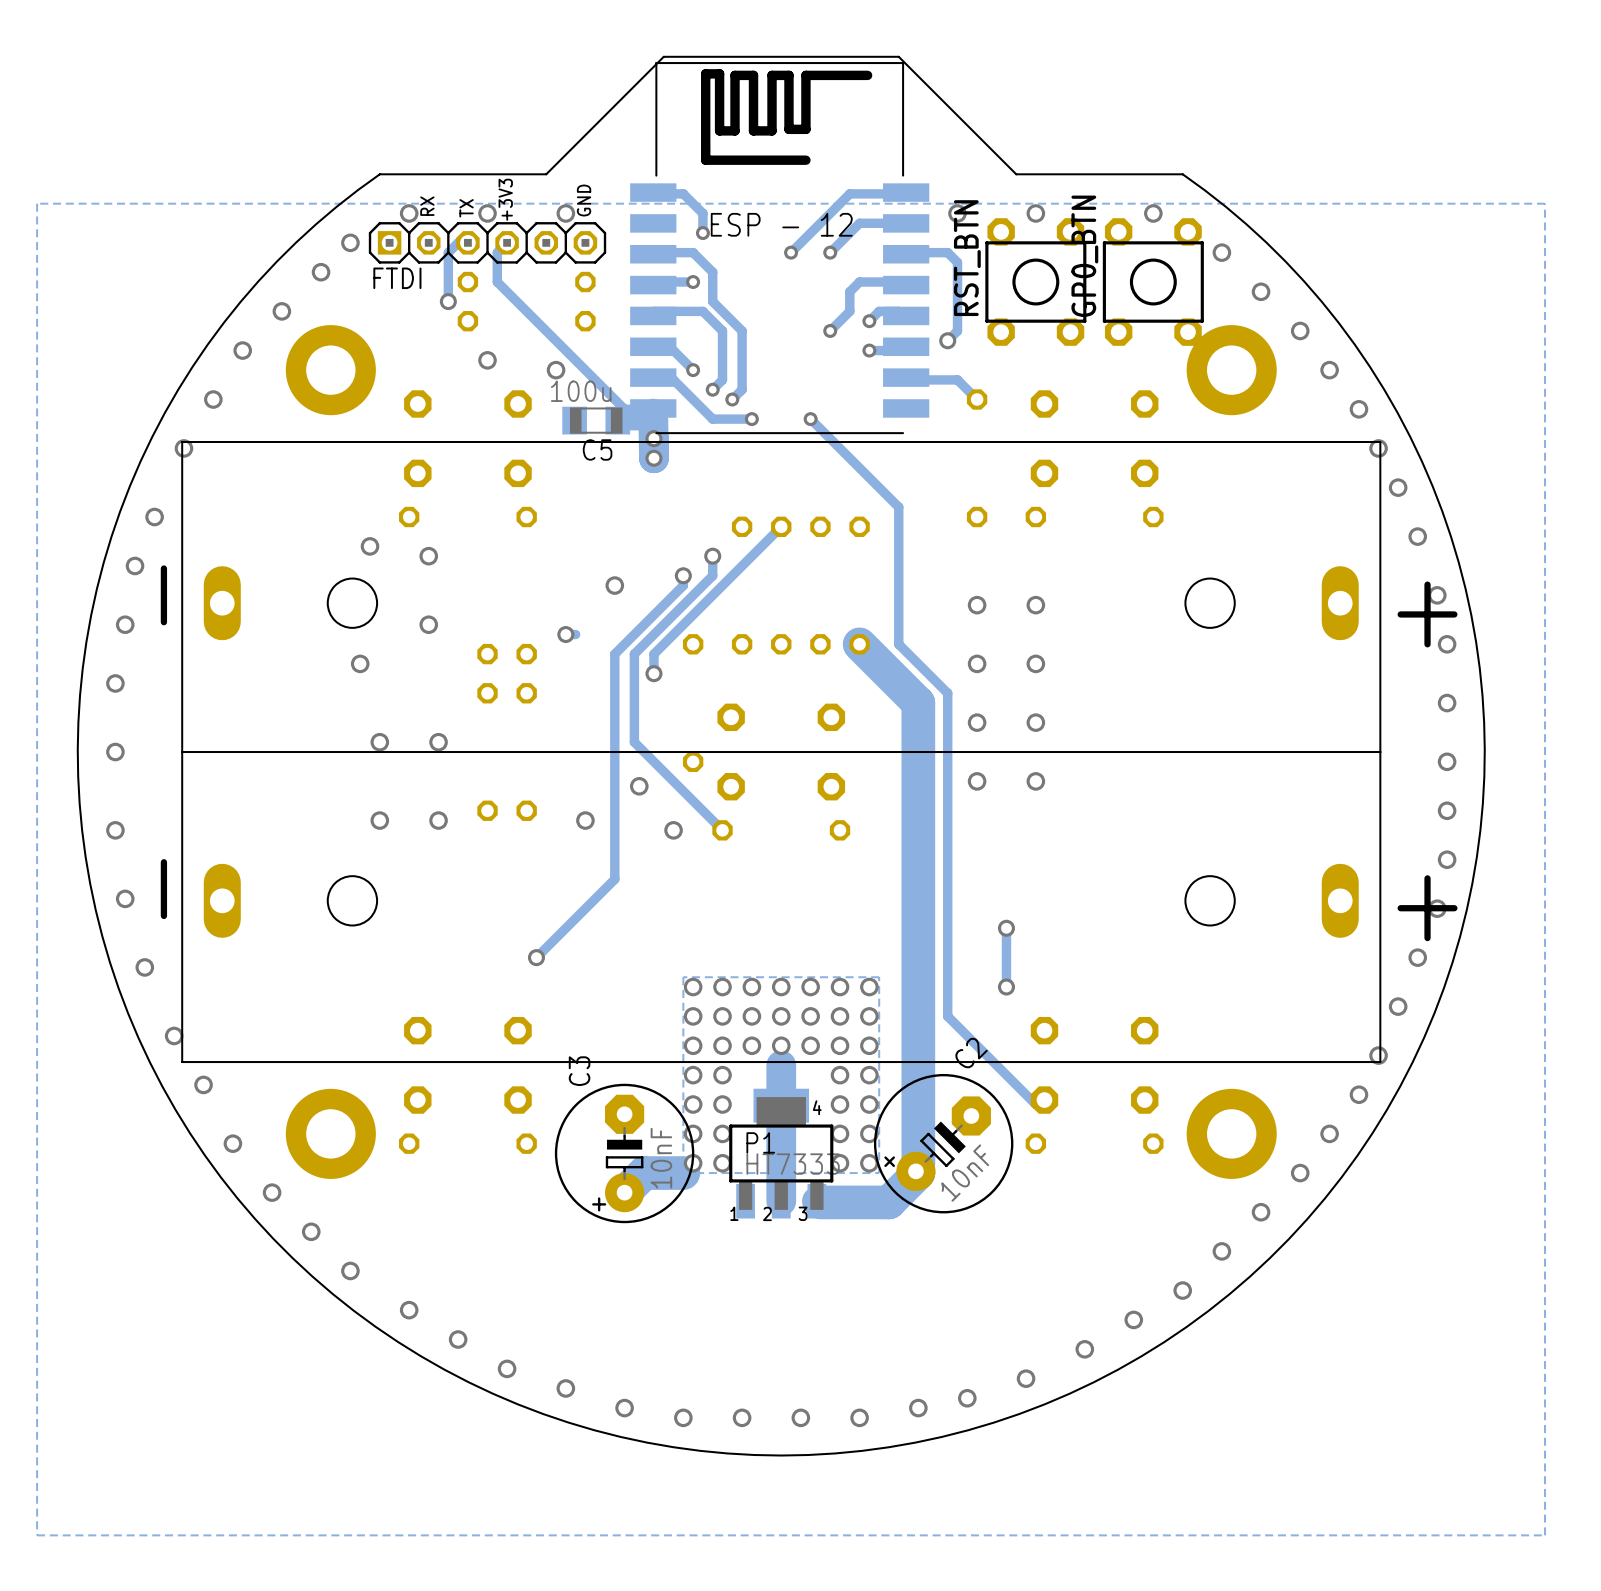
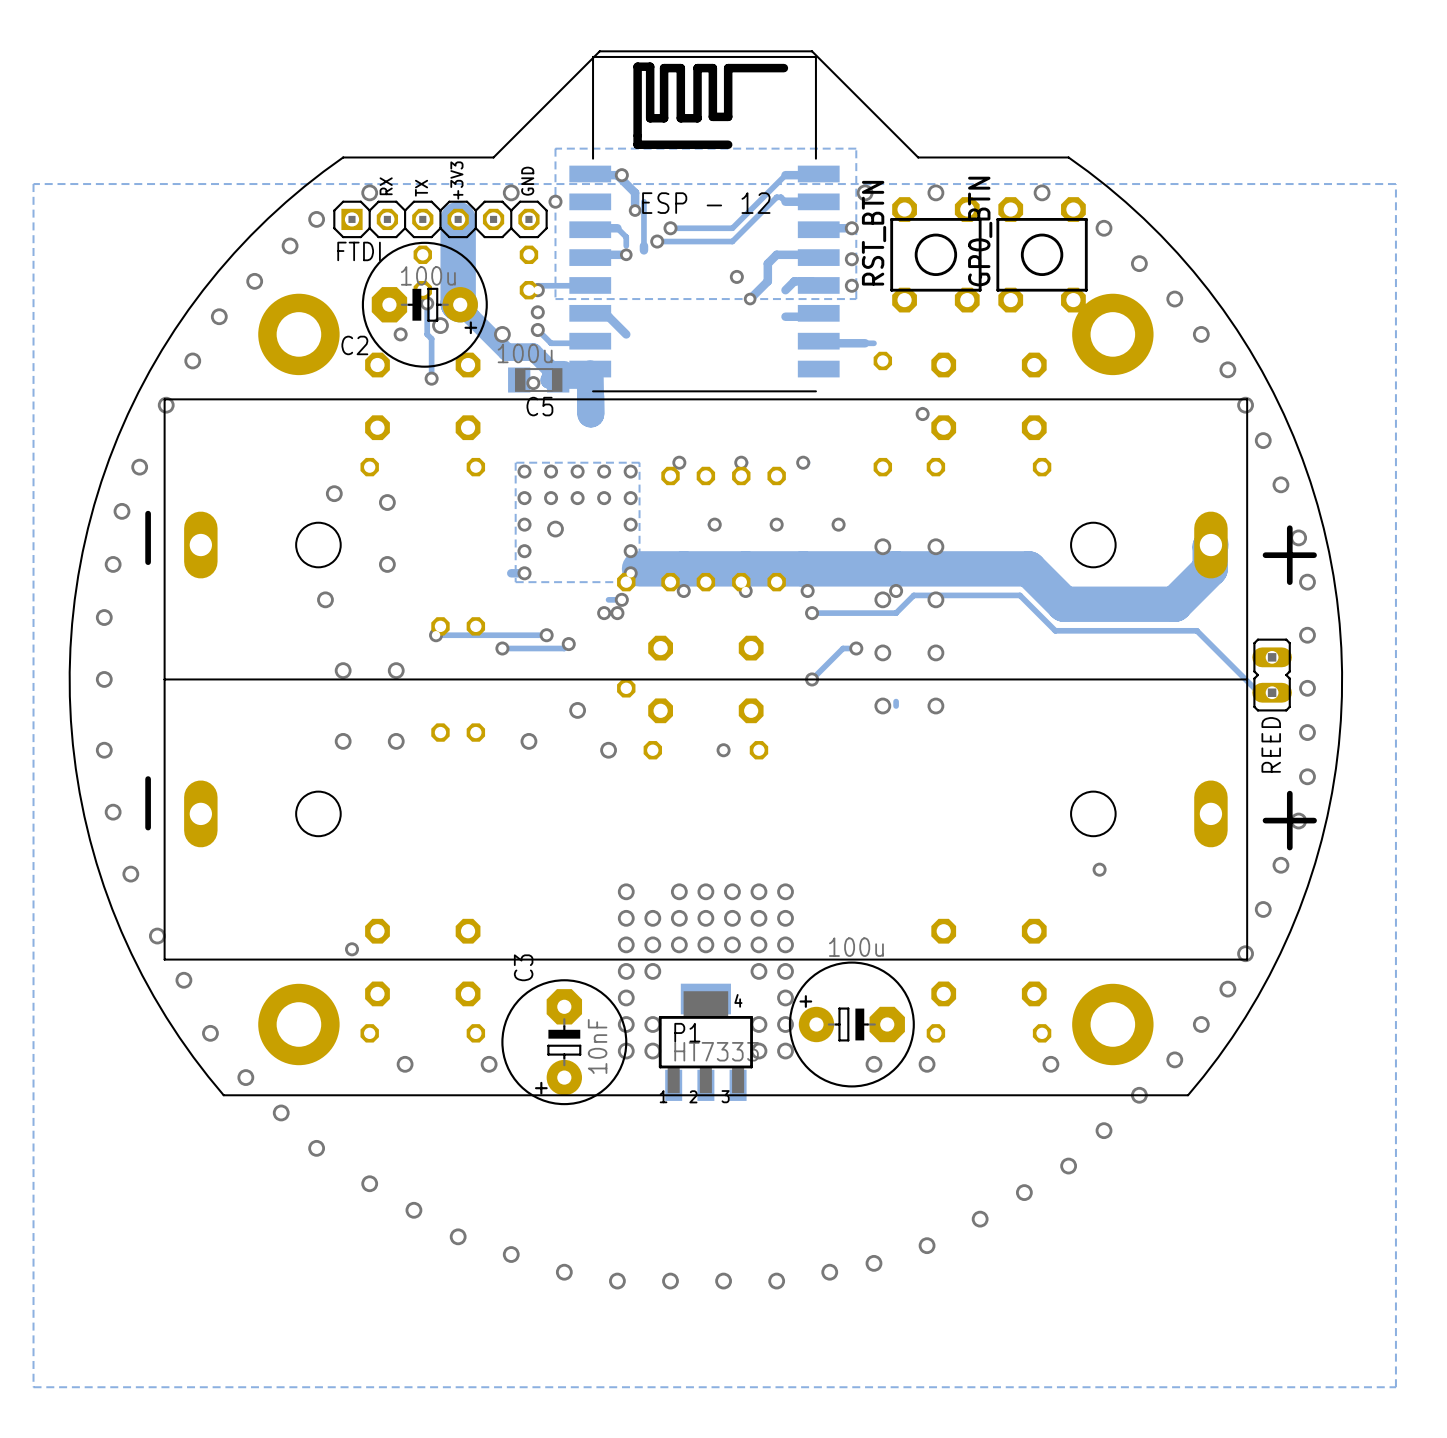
zone outline: none -> (856, 148) (555, 148) (555, 299) (856, 299) (856, 148)
board edge: (1182, 174) (1225, 206) (1266, 242) (1304, 281) (1338, 322) (1369, 366) (1397, 413) (1421, 461) (1442, 511) (1458, 562) (1471, 615) (1479, 668) (1484, 722) (1484, 776) (1480, 830) (1472, 883) (1452, 962) (1434, 1013) (1412, 1062) (1386, 1110) (1357, 1155) (1324, 1198) (1289, 1238) (1250, 1276) (1208, 1310) (1164, 1342) (1094, 1382) (1044, 1404) (993, 1422) (941, 1436) (888, 1447) (835, 1453) (781, 1455) (727, 1453) (673, 1447) (620, 1436) (568, 1422) (517, 1404) (468, 1382) (398, 1342) (353, 1310) (312, 1276) (273, 1238) (237, 1198) (204, 1155) (175, 1110) (150, 1062) (128, 1013) (109, 962) (90, 883) (82, 830) (78, 776) (78, 722) (82, 668) (91, 615) (103, 562) (120, 511) (140, 461) (164, 413) (192, 366) (223, 322) (258, 281) (296, 242) (336, 206) (379, 174) -> (1068, 157) (1107, 186) (1160, 235) (1208, 290) (1249, 350) (1283, 414) (1310, 481) (1329, 552) (1337, 599) (1342, 672) (1338, 744) (1327, 816) (1315, 863) (1299, 909) (1269, 975) (1232, 1037) (1188, 1095) (223, 1095) (179, 1037) (142, 975) (112, 909) (96, 863) (84, 816) (72, 744) (69, 672) (74, 599) (82, 552) (101, 481) (127, 414) (161, 350) (203, 290) (250, 235) (304, 186) (343, 157)
via: none -> (621, 175)
track: (869, 193) (849, 193) (791, 252) -> (785, 175) (732, 228) (670, 228)
via: (487, 213) -> none
via: none -> (555, 201)
track: none -> (643, 201) (643, 245)
track: (869, 223) (859, 223) (830, 252) -> (785, 201) (781, 197) (776, 197) (732, 241) (657, 241)
track: (467, 242) (458, 242) (448, 252) (448, 301) -> none
track: (507, 242) (497, 252) (497, 282) (624, 409) -> (458, 219) (458, 303) (506, 352) (533, 352) (551, 369) (549, 380) (555, 369) (564, 369)
track: (683, 252) (693, 252) (712, 272) -> (617, 228) (626, 237) (626, 245)
via: none -> (670, 228)
via: (791, 252) -> none
via: (830, 252) -> none
track: (942, 252) (947, 252) (957, 262) (957, 330) (947, 340) -> none
via: none -> (851, 228)
via: none -> (657, 241)
track: (712, 277) (712, 301) (742, 330) (742, 389) (732, 399) -> none
via: none -> (851, 259)
via: (448, 301) -> none
via: none -> (736, 276)
track: (653, 315) (653, 311) (702, 311) (722, 330) (722, 379) (712, 389) -> (590, 285) (537, 285) (537, 290)
via: none -> (851, 285)
via: none -> (537, 290)
via: (869, 321) -> none
track: none -> (427, 303) (427, 334) (431, 338) (431, 378)
via: none -> (427, 303)
via: (947, 340) -> none
via: none -> (537, 312)
via: (869, 350) -> none
track: none -> (537, 330) (551, 343) (586, 343) (590, 341)
via: none -> (537, 330)
via: none -> (400, 334)
via: (693, 370) -> none
track: (673, 379) (712, 419) (751, 419) -> none
track: (957, 379) (977, 399) -> (865, 343) (873, 343)
via: (712, 389) -> none
via: (732, 399) -> none
via: none -> (431, 378)
via: (751, 419) -> none
track: (810, 419) (898, 507) (898, 644) (947, 693) (947, 1016) (1035, 1104) (1044, 1100) -> none
via: (810, 419) -> none
via: none -> (533, 383)
via: (653, 438) -> none
via: (653, 458) -> none
via: none -> (922, 414)
zone outline: none -> (639, 462) (639, 582) (515, 582) (515, 462) (639, 462)
via: none -> (679, 462)
via: none -> (741, 462)
via: none -> (803, 462)
via: none -> (524, 471)
via: none -> (551, 471)
via: none -> (577, 471)
via: none -> (604, 471)
via: none -> (630, 471)
track: (781, 526) (653, 654) (653, 673) -> none
via: none -> (524, 498)
via: none -> (551, 498)
via: none -> (577, 498)
via: none -> (604, 498)
via: none -> (630, 498)
track: (712, 556) (712, 575) (634, 654) (634, 742) (722, 830) -> none
via: (712, 556) -> none
track: (683, 575) (683, 585) (614, 654) (614, 879) (536, 957) -> none
via: (683, 575) -> none
via: none -> (524, 524)
via: none -> (630, 524)
via: none -> (714, 524)
via: none -> (776, 524)
via: none -> (838, 524)
track: none -> (1210, 545) (1210, 568) (1174, 604) (1064, 604) (1028, 568) (639, 568)
via: none -> (524, 551)
via: none -> (630, 551)
via position: (565, 634) -> (524, 573)
via: none -> (630, 573)
track: (859, 644) (918, 703) (918, 1163) (915, 1171) (918, 1173) (888, 1202) (816, 1201) -> none
part: (507, 654) -> none
via: none -> (683, 590)
via: none -> (745, 590)
via: none -> (807, 590)
via: none -> (896, 590)
track: none -> (621, 599) (608, 599)
via: none -> (621, 599)
via: (653, 673) -> none
via: none -> (604, 613)
via: none -> (617, 613)
track: none -> (812, 613) (896, 613) (913, 595) (1019, 595) (1055, 630) (1196, 630) (1258, 692) (1272, 692)
via: none -> (812, 613)
via: none -> (436, 635)
track: none -> (546, 635) (436, 635)
via: none -> (546, 635)
track: none -> (568, 644) (564, 648) (502, 648)
via: none -> (568, 644)
via: none -> (502, 648)
track: none -> (856, 648) (843, 648) (812, 679)
via: none -> (856, 648)
REED: none -> (1272, 675)
via: none -> (812, 679)
track: none -> (896, 701) (896, 706)
via: none -> (723, 750)
track: (1006, 928) (1006, 987) -> none
via: (1006, 928) -> none
via: (536, 957) -> none
via: none -> (1099, 869)
zone outline: (879, 977) (683, 977) (683, 1173) (879, 1173) (879, 977) -> none
via: (722, 987) -> none
via: (1006, 987) -> none
via: none -> (352, 949)
track: (781, 1065) (781, 1201) -> none
via: (722, 1104) -> none
via: (840, 1104) -> none
part: none -> 100u (851, 1024)
C2 rotation: 0° (943, 1143) -> 135° counterclockwise (424, 304)
C2 position: (943, 1143) -> (424, 304)
track: (683, 1173) (644, 1173) (624, 1192) -> none
C2 value: 10nF (965, 1173) -> 100u (428, 275)
via: none -> (405, 1064)
via: none -> (489, 1064)
via: none -> (873, 1064)
via: none -> (927, 1064)
via: none -> (1050, 1064)

